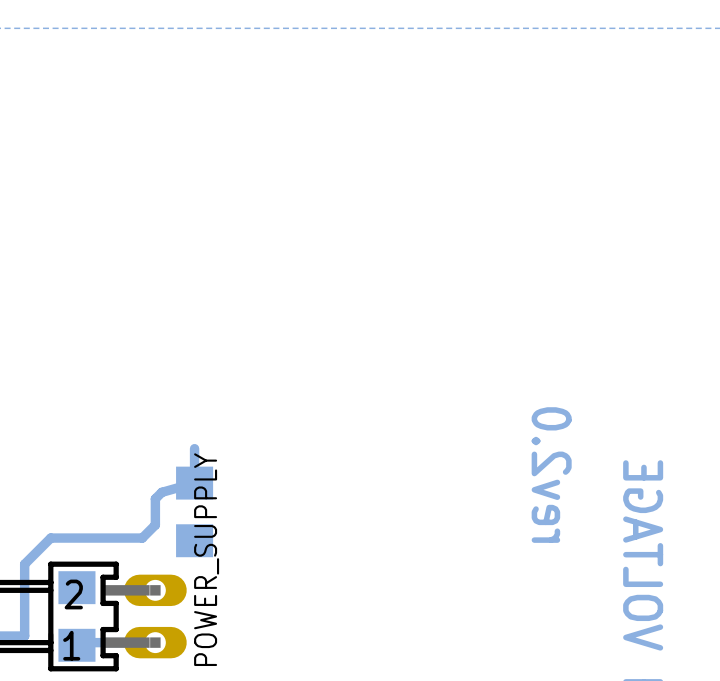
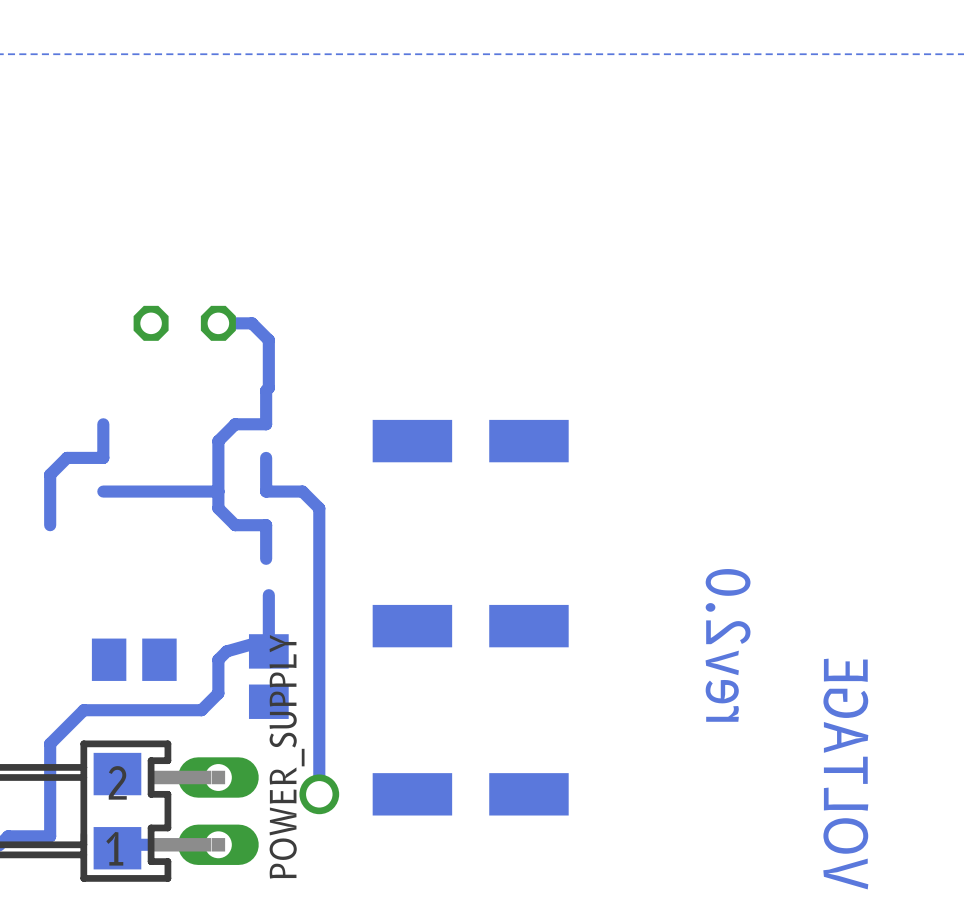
part: none -> (184, 323)
bottom track: none -> (218, 323) (252, 323) (268, 340) (268, 387) (266, 390) (266, 424) (235, 424) (218, 441) (218, 508) (235, 525) (266, 525) (266, 558)
bottom track: none -> (103, 424) (103, 457) (66, 457) (50, 474) (50, 525)
part: none -> (470, 441)
bottom track: none -> (266, 457) (266, 491) (302, 491) (319, 508) (319, 794)
bottom track: none -> (103, 491) (218, 491)
part footprint: [176, 466, 214, 558] -> [248, 634, 289, 719]
part: none -> (470, 626)
part: none -> (134, 659)
via: none -> (319, 794)
part: none -> (470, 794)

